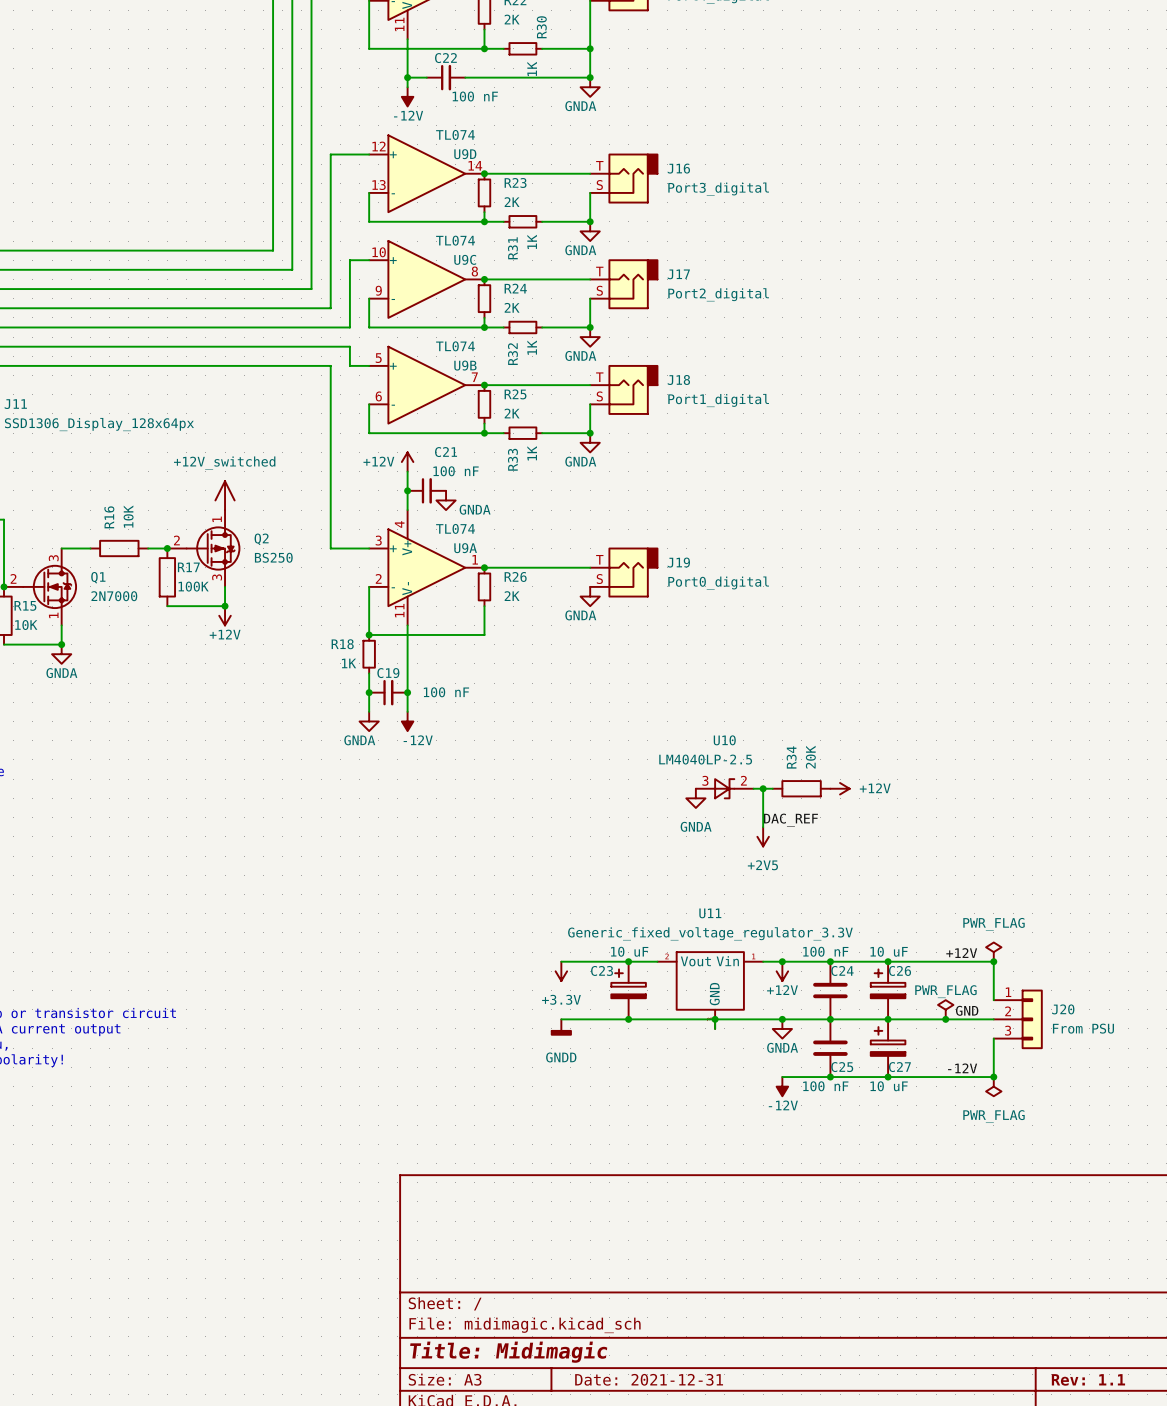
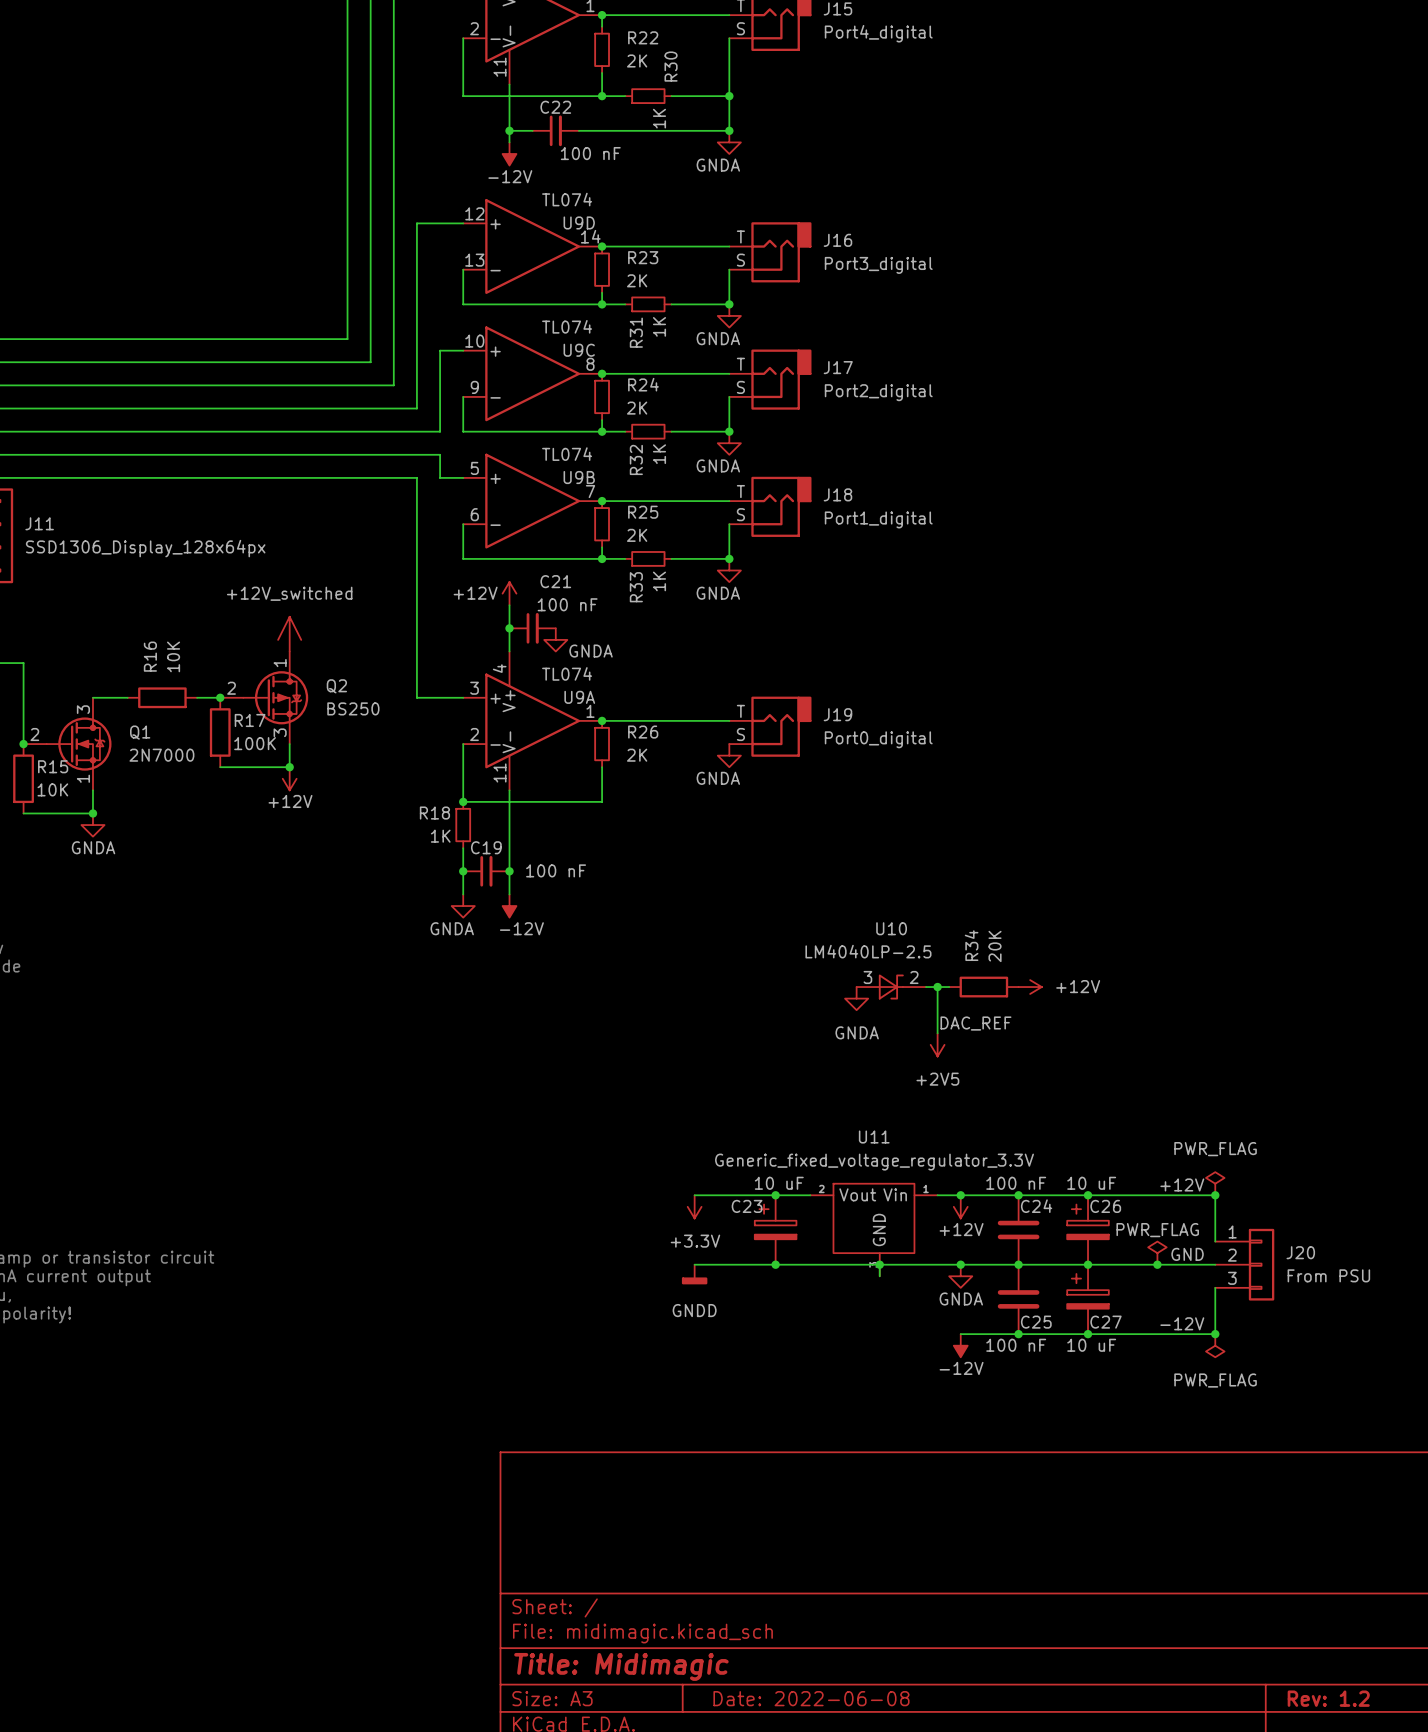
title block: Date: 2021-12-31 (649, 1379) -> Date: 2022-06-08 (811, 1698)
title block: Rev: 1.1 (1088, 1379) -> Rev: 1.2 (1328, 1698)

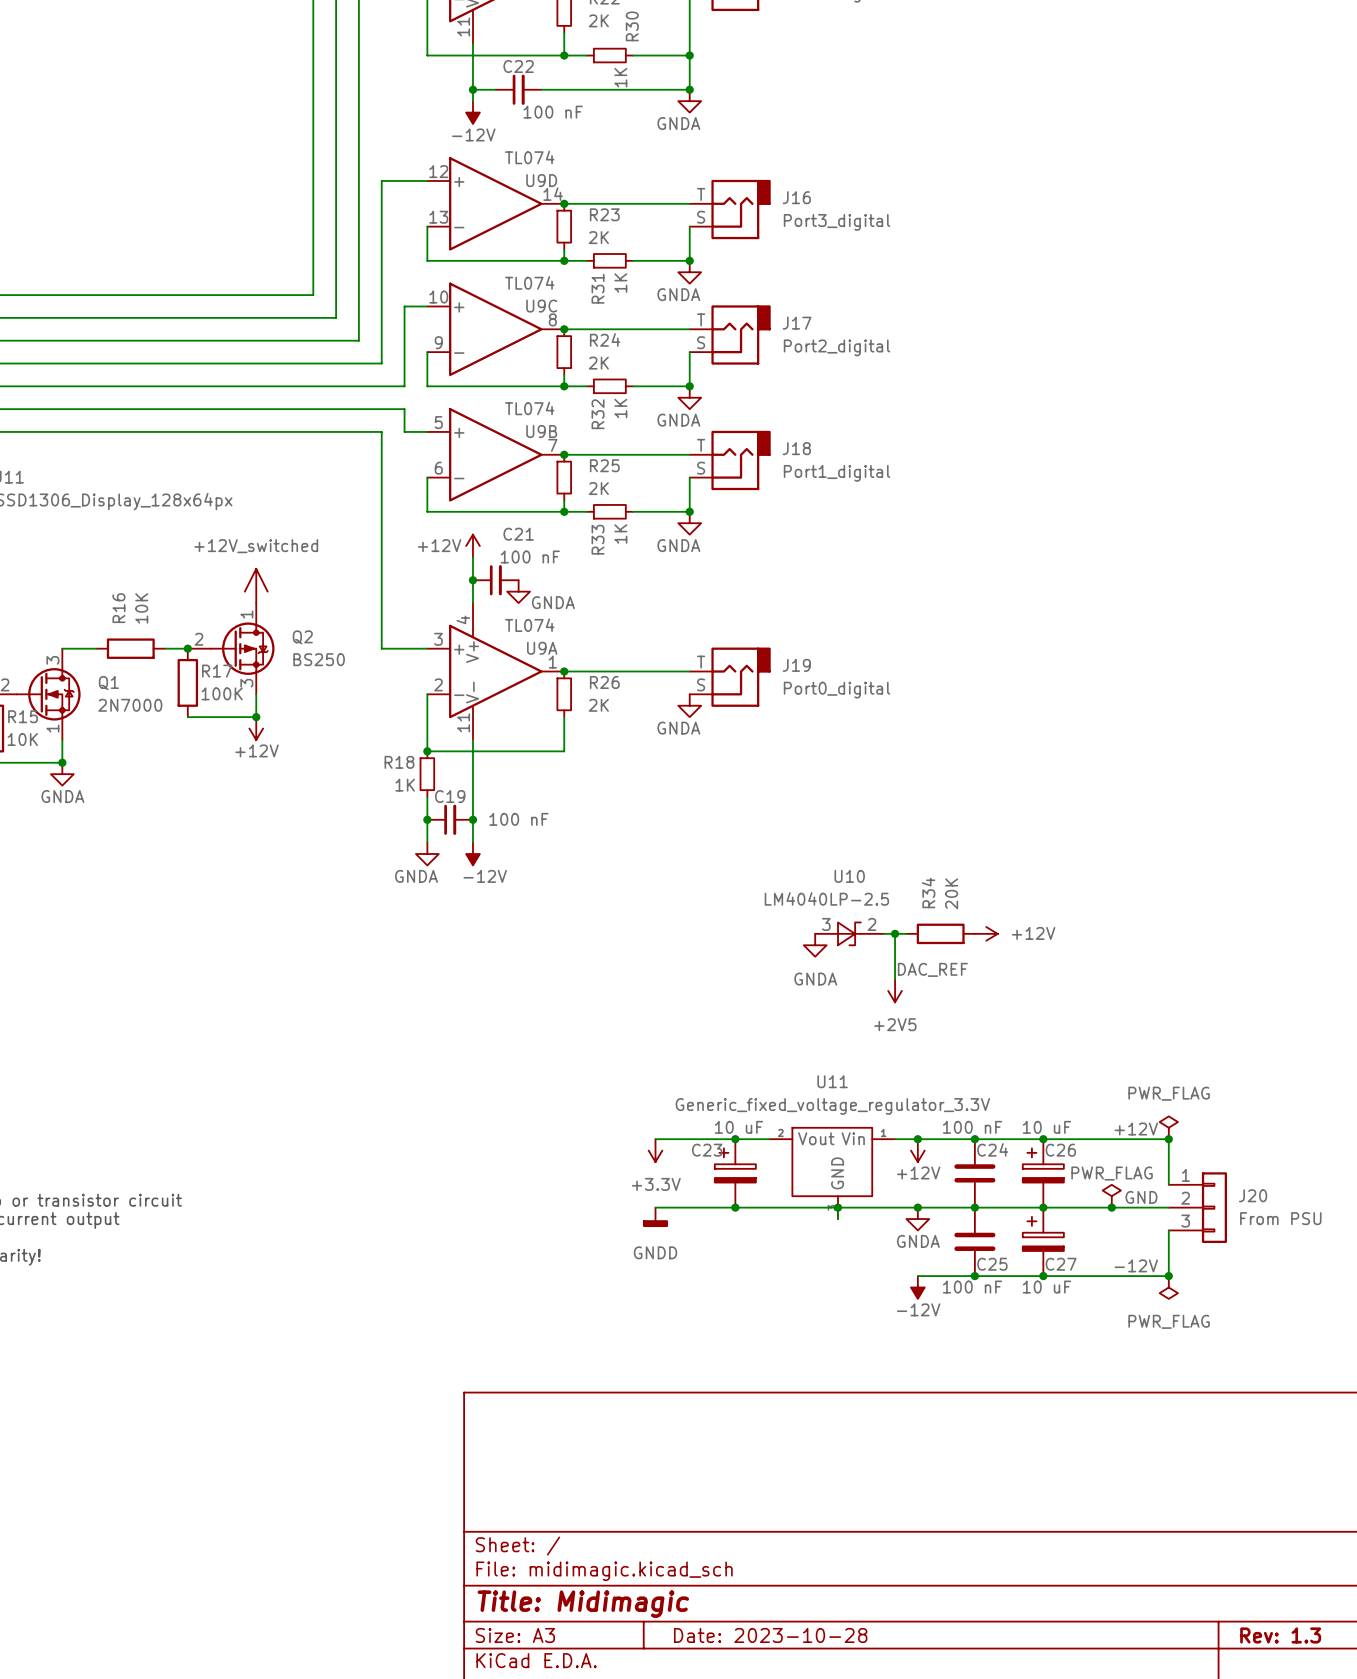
title block: Date: 2022-06-08 (811, 1698) -> Date: 2023-10-28 (770, 1635)
title block: Rev: 1.2 (1328, 1698) -> Rev: 1.3 (1280, 1635)

